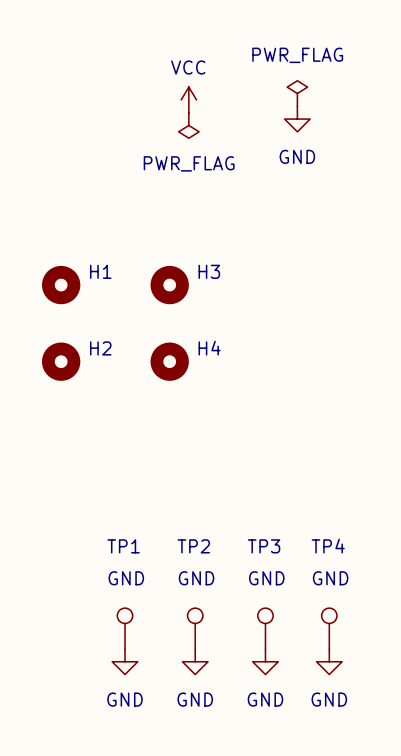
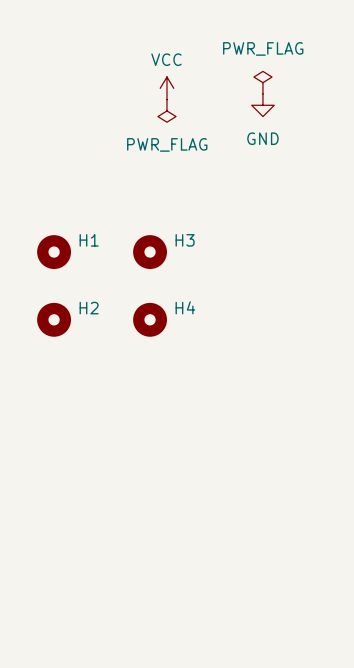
TP1: GND (125, 628) -> none
TP2: GND (195, 628) -> none
TP3: GND (265, 628) -> none
TP4: GND (329, 628) -> none
power symbol: GND (125, 661) -> none
power symbol: GND (195, 661) -> none
power symbol: GND (265, 661) -> none
power symbol: GND (329, 661) -> none

